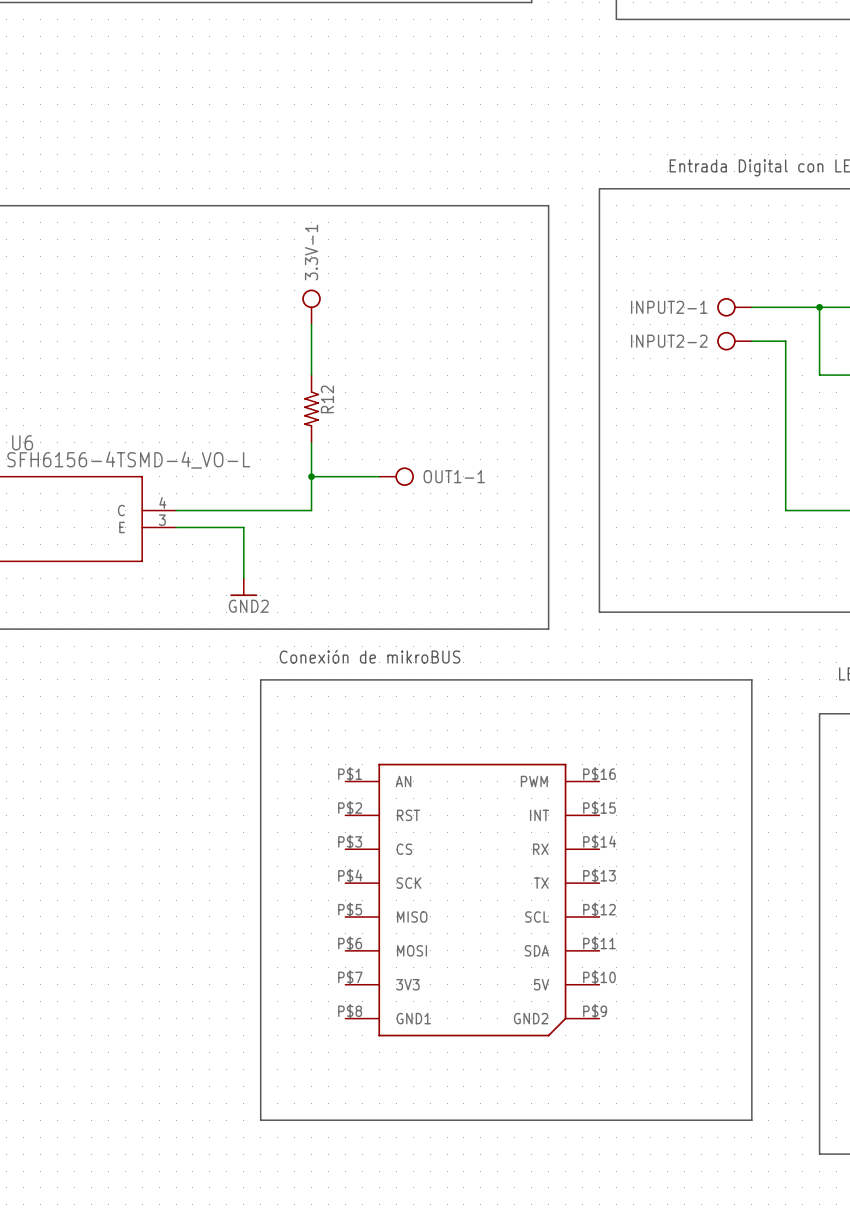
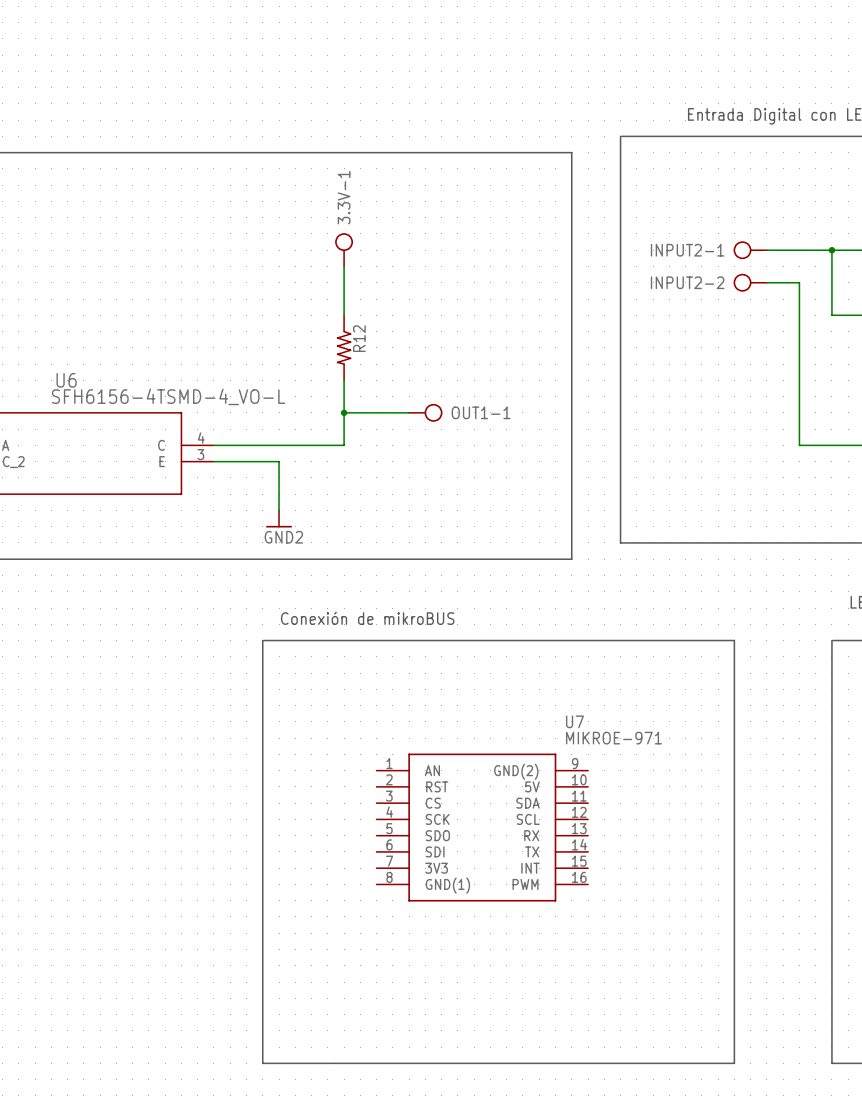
text position: Conexión de mikroBUS (369, 656) -> Conexión de mikroBUS (367, 618)
line: (260, 679) (260, 1120) (328, 1120) -> (262, 640) (262, 1063) (327, 1063)
line: (261, 679) (751, 679) (751, 1120) (329, 1120) -> (263, 640) (734, 640) (734, 1063) (328, 1063)
part: (472, 900) -> none
U7: none -> MIKROE-971 (482, 827)

